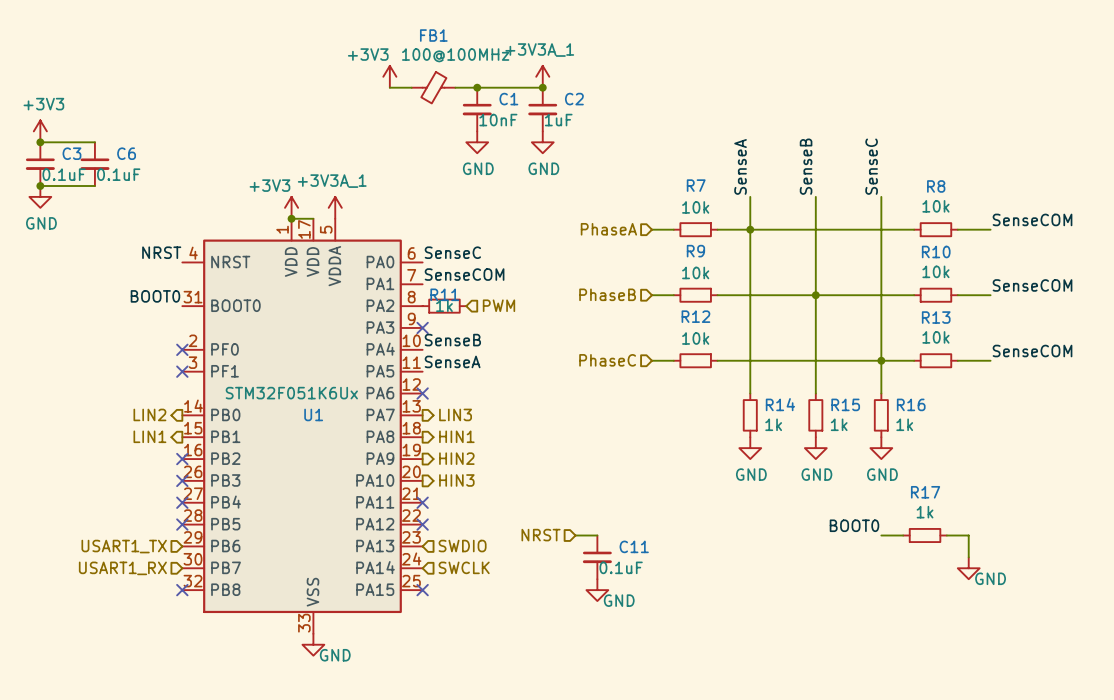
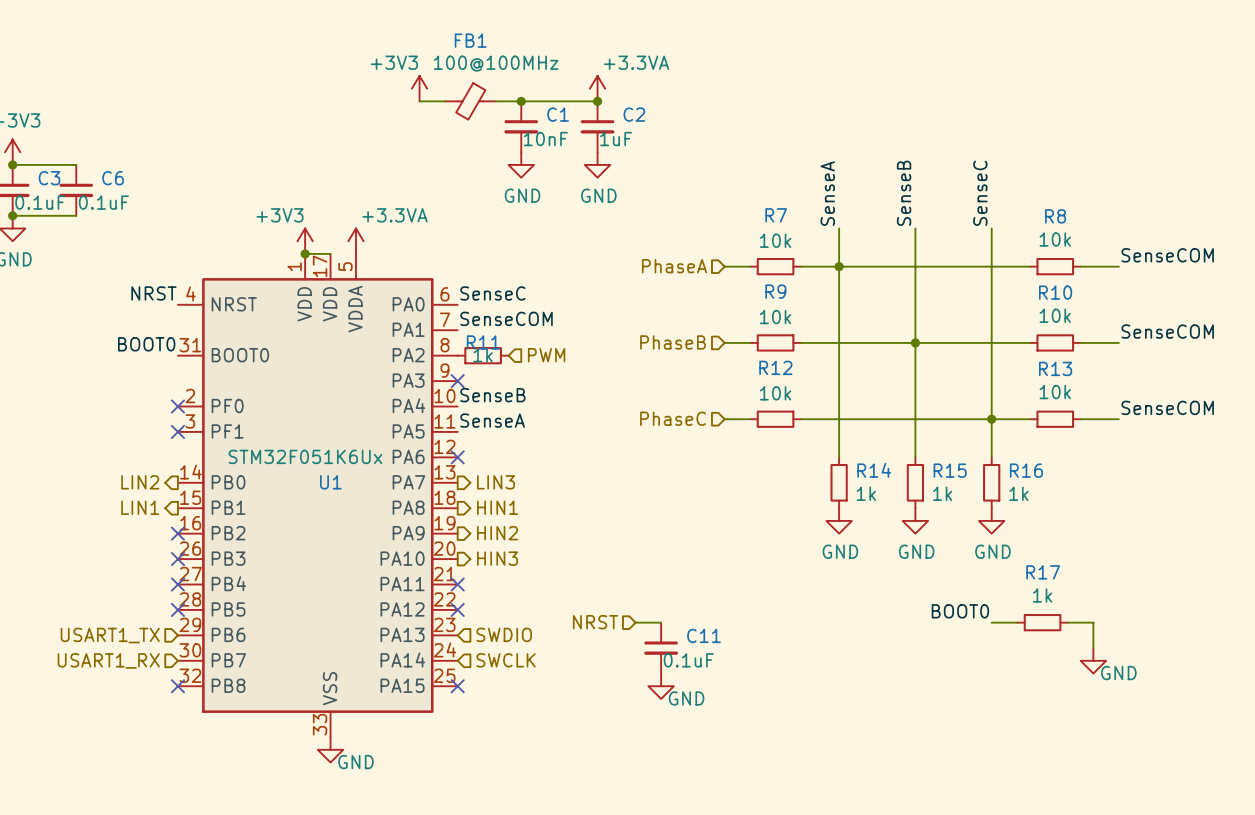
power symbol: +3V3A_1 (542, 76) -> +3.3VA (597, 88)
power symbol: +3V3A_1 (335, 207) -> +3.3VA (355, 241)

